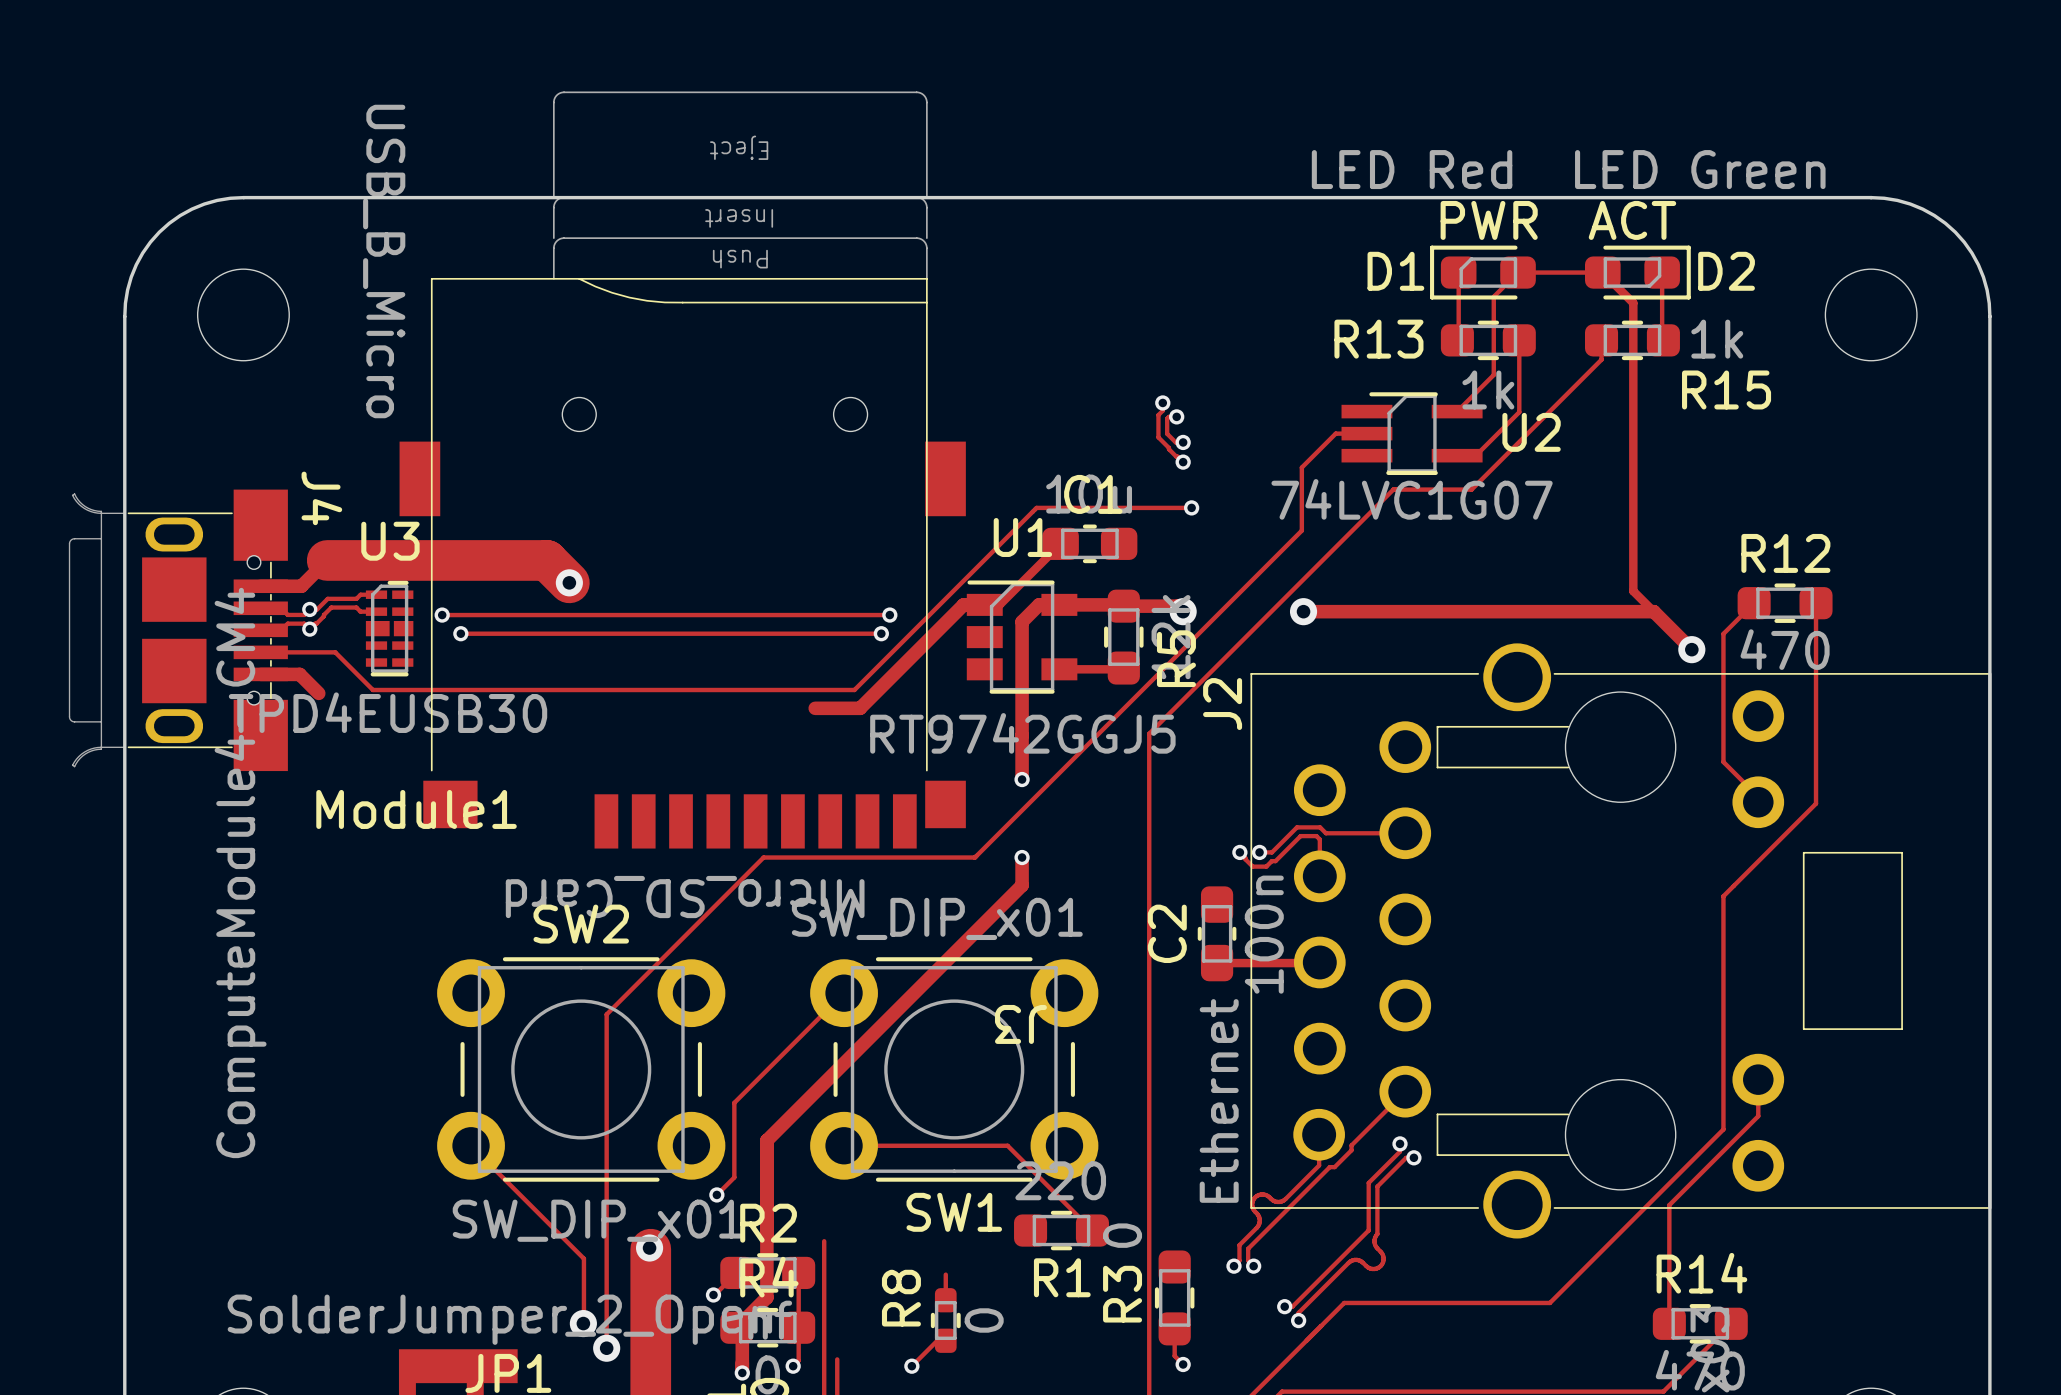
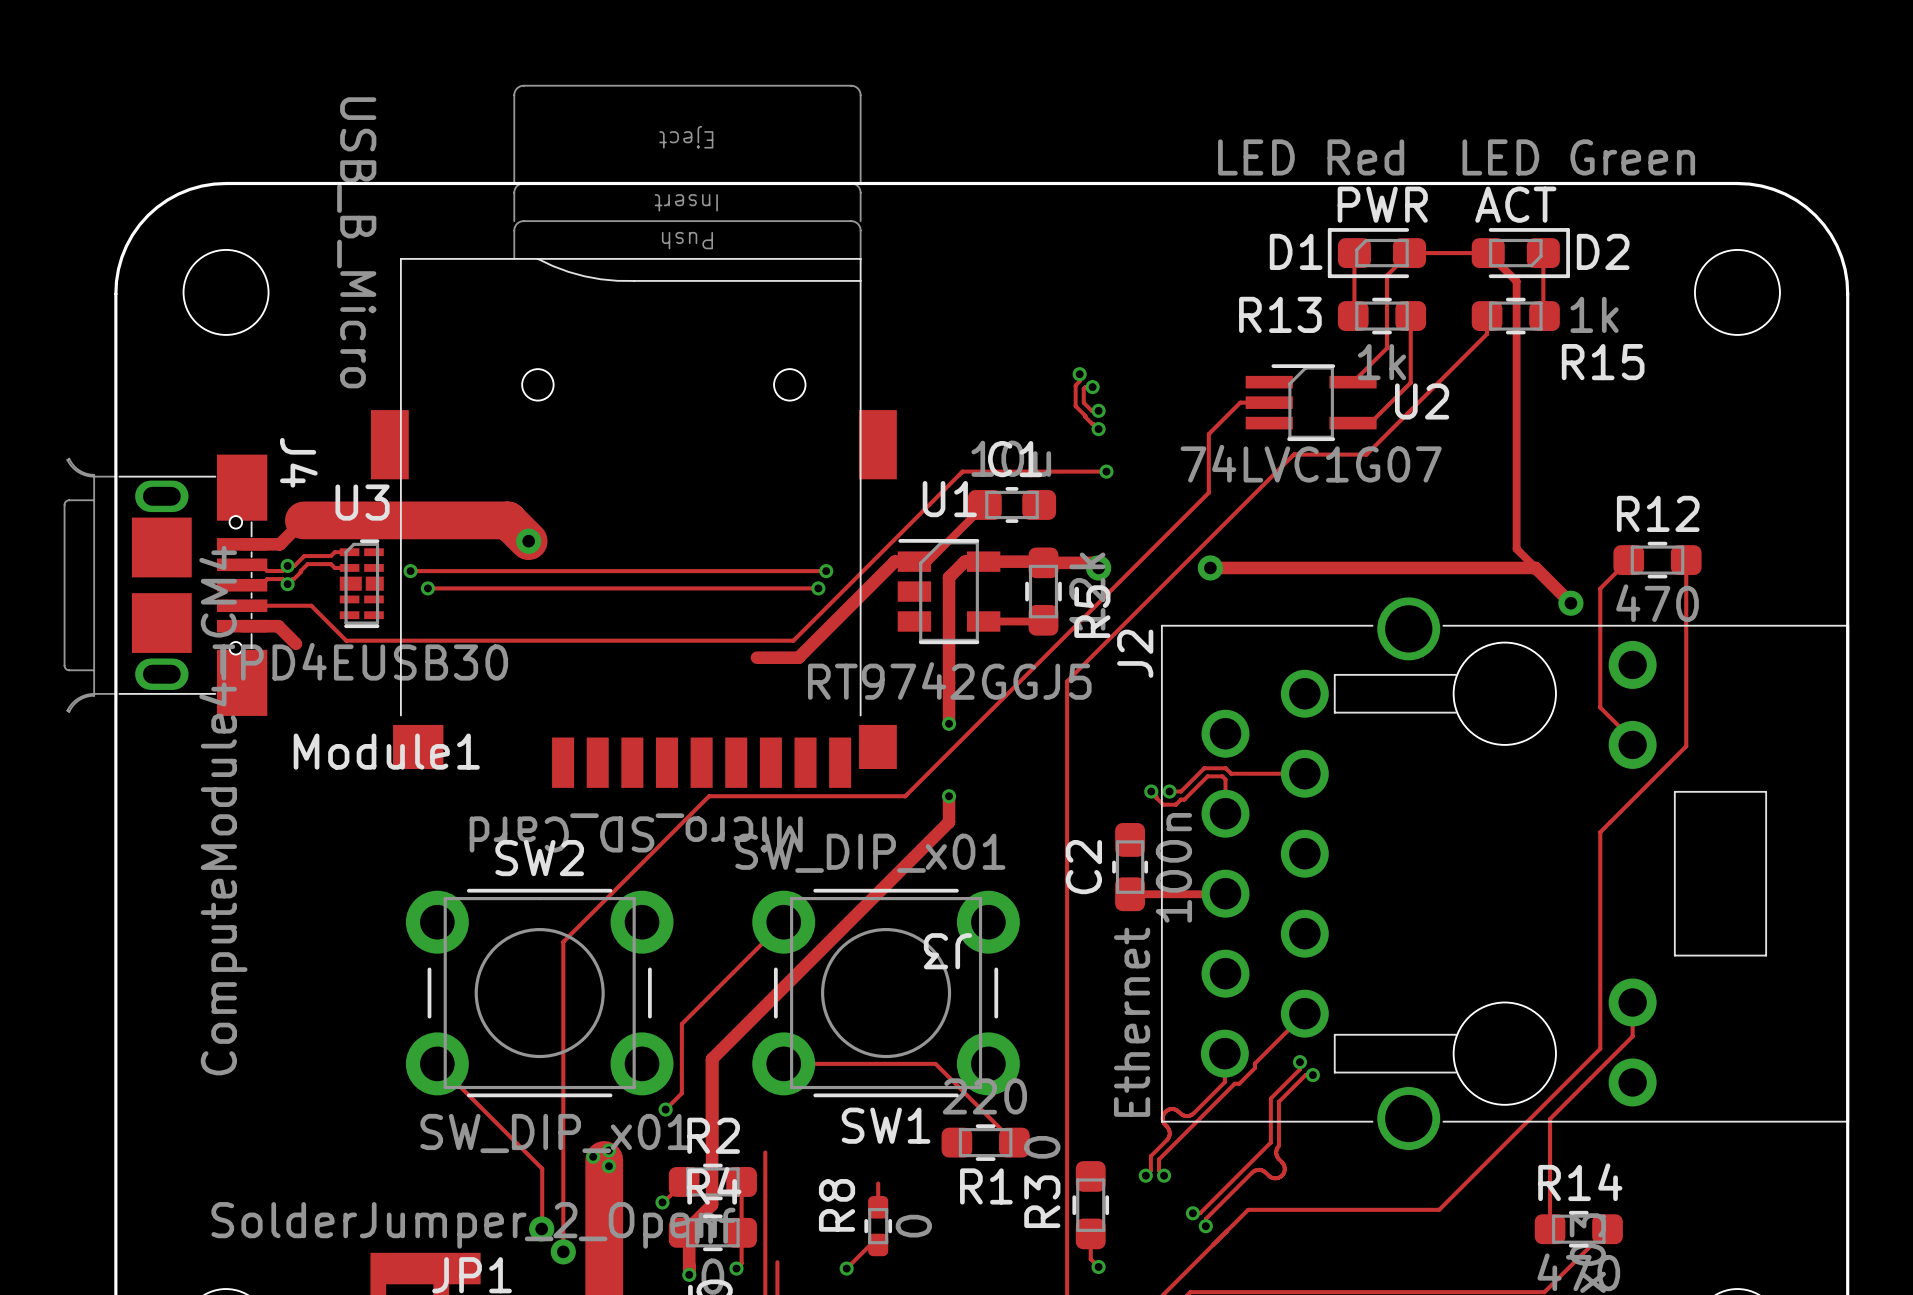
via: none -> (608, 1150)
via: none -> (593, 1156)
via: (649, 1248) -> none
via: none -> (608, 1166)

